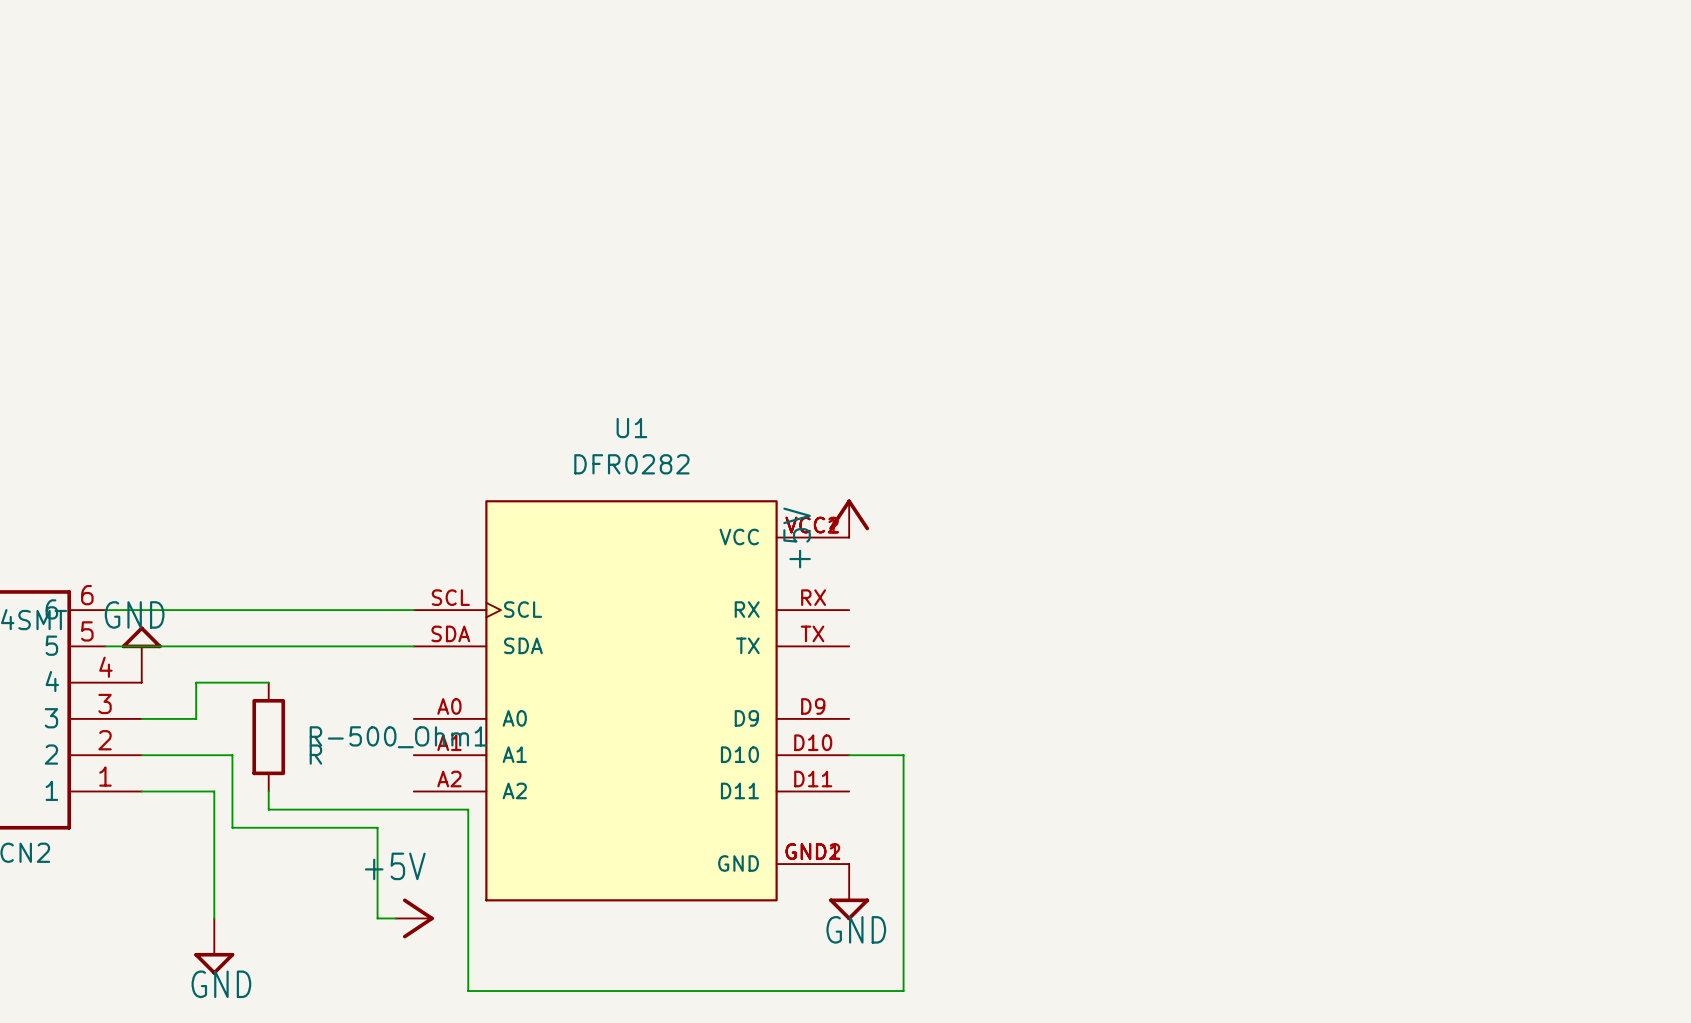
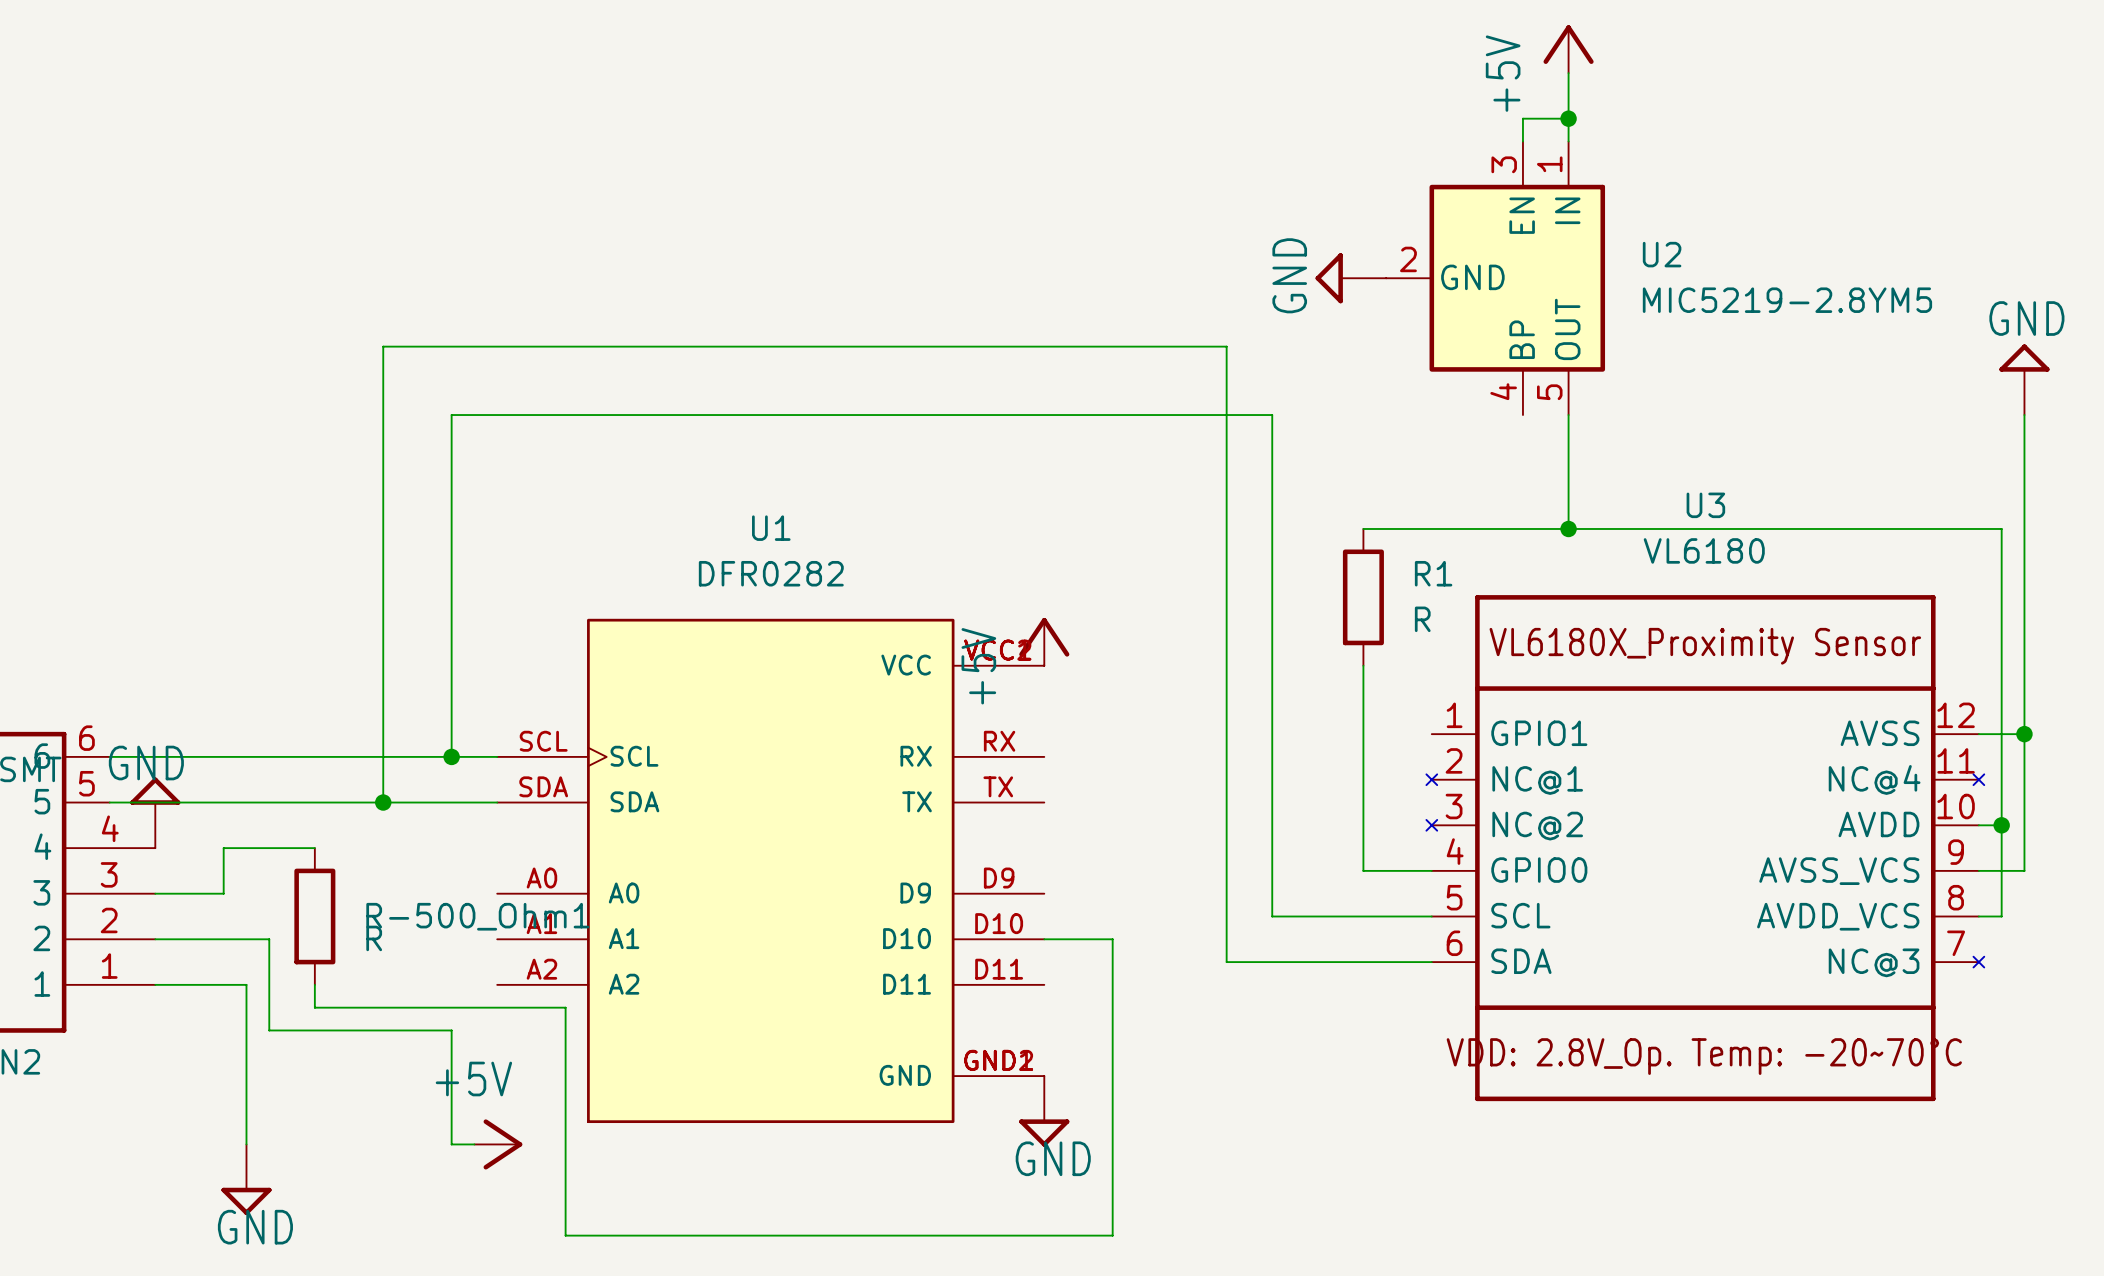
power symbol: none -> +5V (1568, 49)
wire: none -> (1568, 73) (1568, 141)
wire: none -> (1568, 118) (1522, 118) (1522, 141)
junction: none -> (1568, 118)
power symbol: none -> GND (1350, 278)
U2: none -> MIC5219-2.8YM5 (1495, 278)
power symbol: none -> GND (2024, 379)
wire: none -> (1568, 415) (1568, 528)
wire: none -> (2024, 415) (2024, 870) (1978, 870)
wire: none -> (1363, 528) (2001, 528) (2001, 916) (1978, 916)
junction: none -> (1568, 528)
R1: none -> R (1363, 597)
wire: none -> (1363, 665) (1363, 870) (1431, 870)
wire: none -> (1978, 734) (2024, 734)
junction: none -> (2024, 734)
wire: none -> (451, 756) (451, 415) (1272, 415) (1272, 916) (1431, 916)
junction: none -> (451, 756)
wire: none -> (383, 802) (383, 346) (1226, 346) (1226, 962) (1431, 962)
junction: none -> (383, 802)
wire: none -> (1978, 825) (2001, 825)
junction: none -> (2001, 825)
U3: none -> VL6180 (1705, 848)

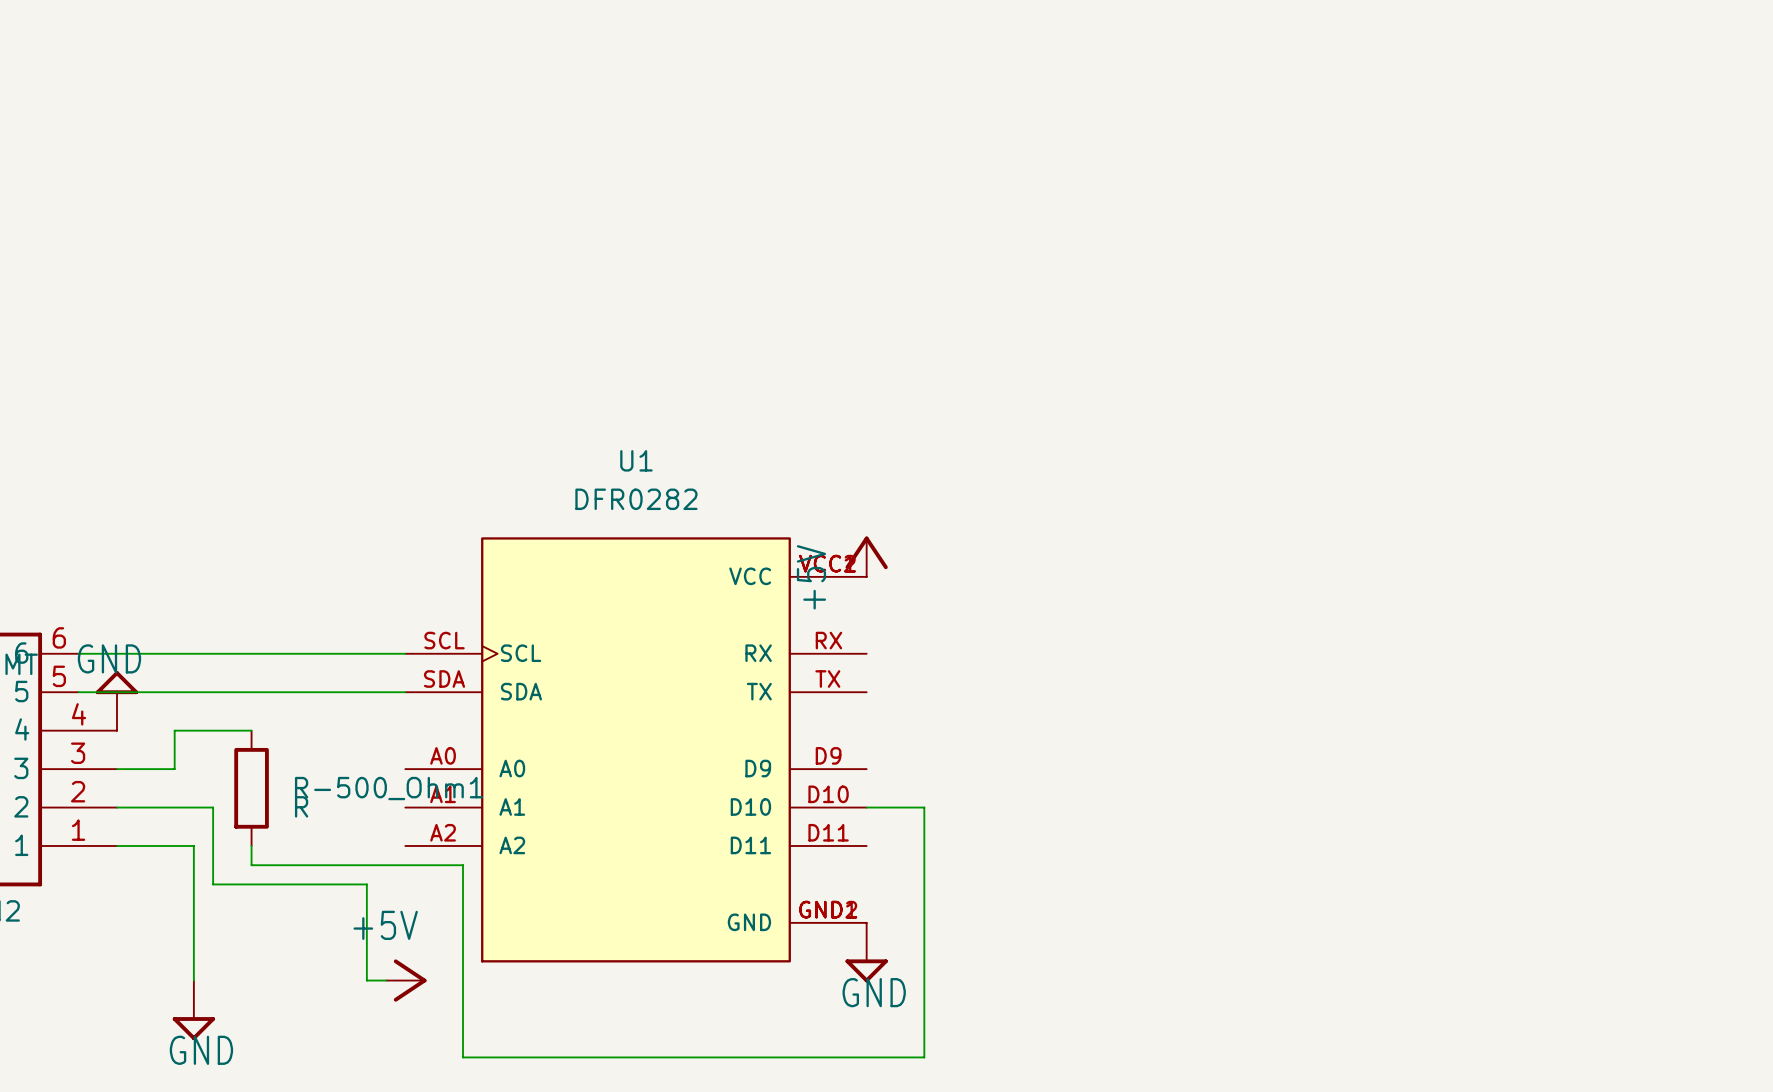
power symbol: +5V (1568, 49) -> none
wire: (1568, 73) (1568, 141) -> none
wire: (1568, 118) (1522, 118) (1522, 141) -> none
junction: (1568, 118) -> none
power symbol: GND (1350, 278) -> none
U2: MIC5219-2.8YM5 (1495, 278) -> none
power symbol: GND (2024, 379) -> none
wire: (1568, 415) (1568, 528) -> none
wire: (2024, 415) (2024, 870) (1978, 870) -> none
wire: (1363, 528) (2001, 528) (2001, 916) (1978, 916) -> none
junction: (1568, 528) -> none
R1: R (1363, 597) -> none
wire: (1363, 665) (1363, 870) (1431, 870) -> none
wire: (1978, 734) (2024, 734) -> none
junction: (2024, 734) -> none
wire: (451, 756) (451, 415) (1272, 415) (1272, 916) (1431, 916) -> none
junction: (451, 756) -> none
wire: (383, 802) (383, 346) (1226, 346) (1226, 962) (1431, 962) -> none
junction: (383, 802) -> none
wire: (1978, 825) (2001, 825) -> none
junction: (2001, 825) -> none
U3: VL6180 (1705, 848) -> none

